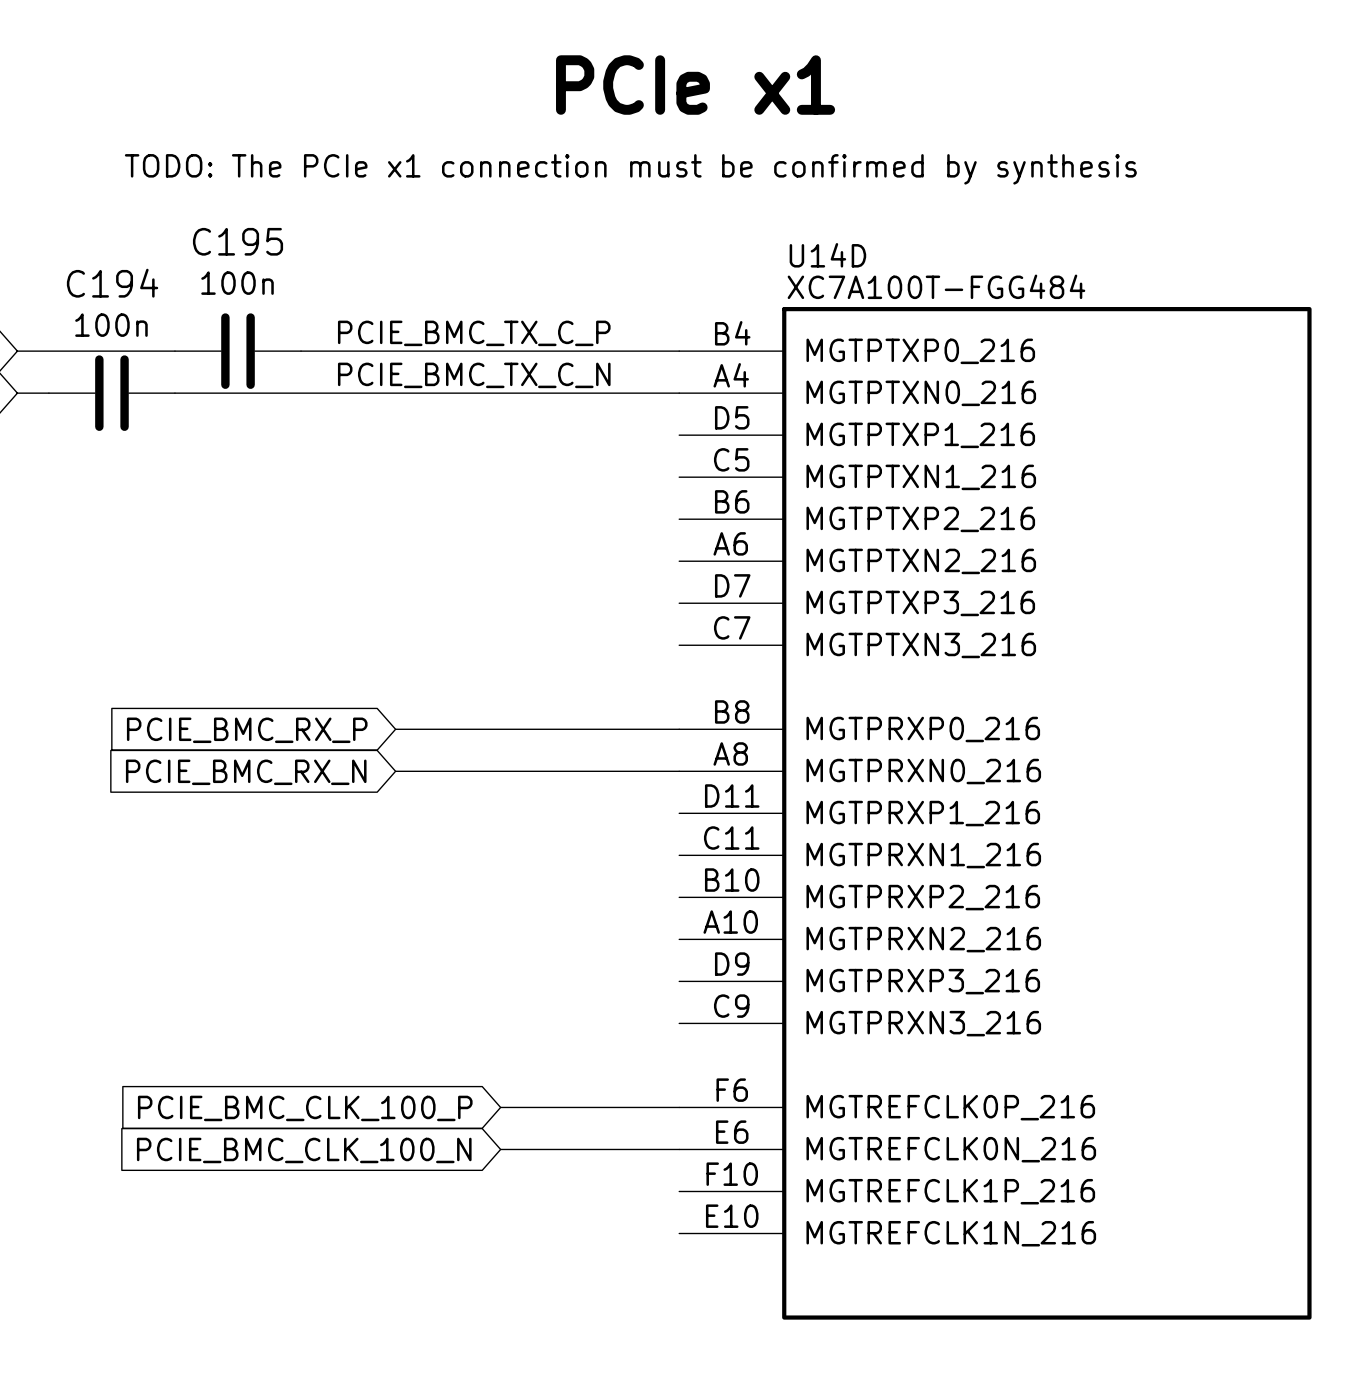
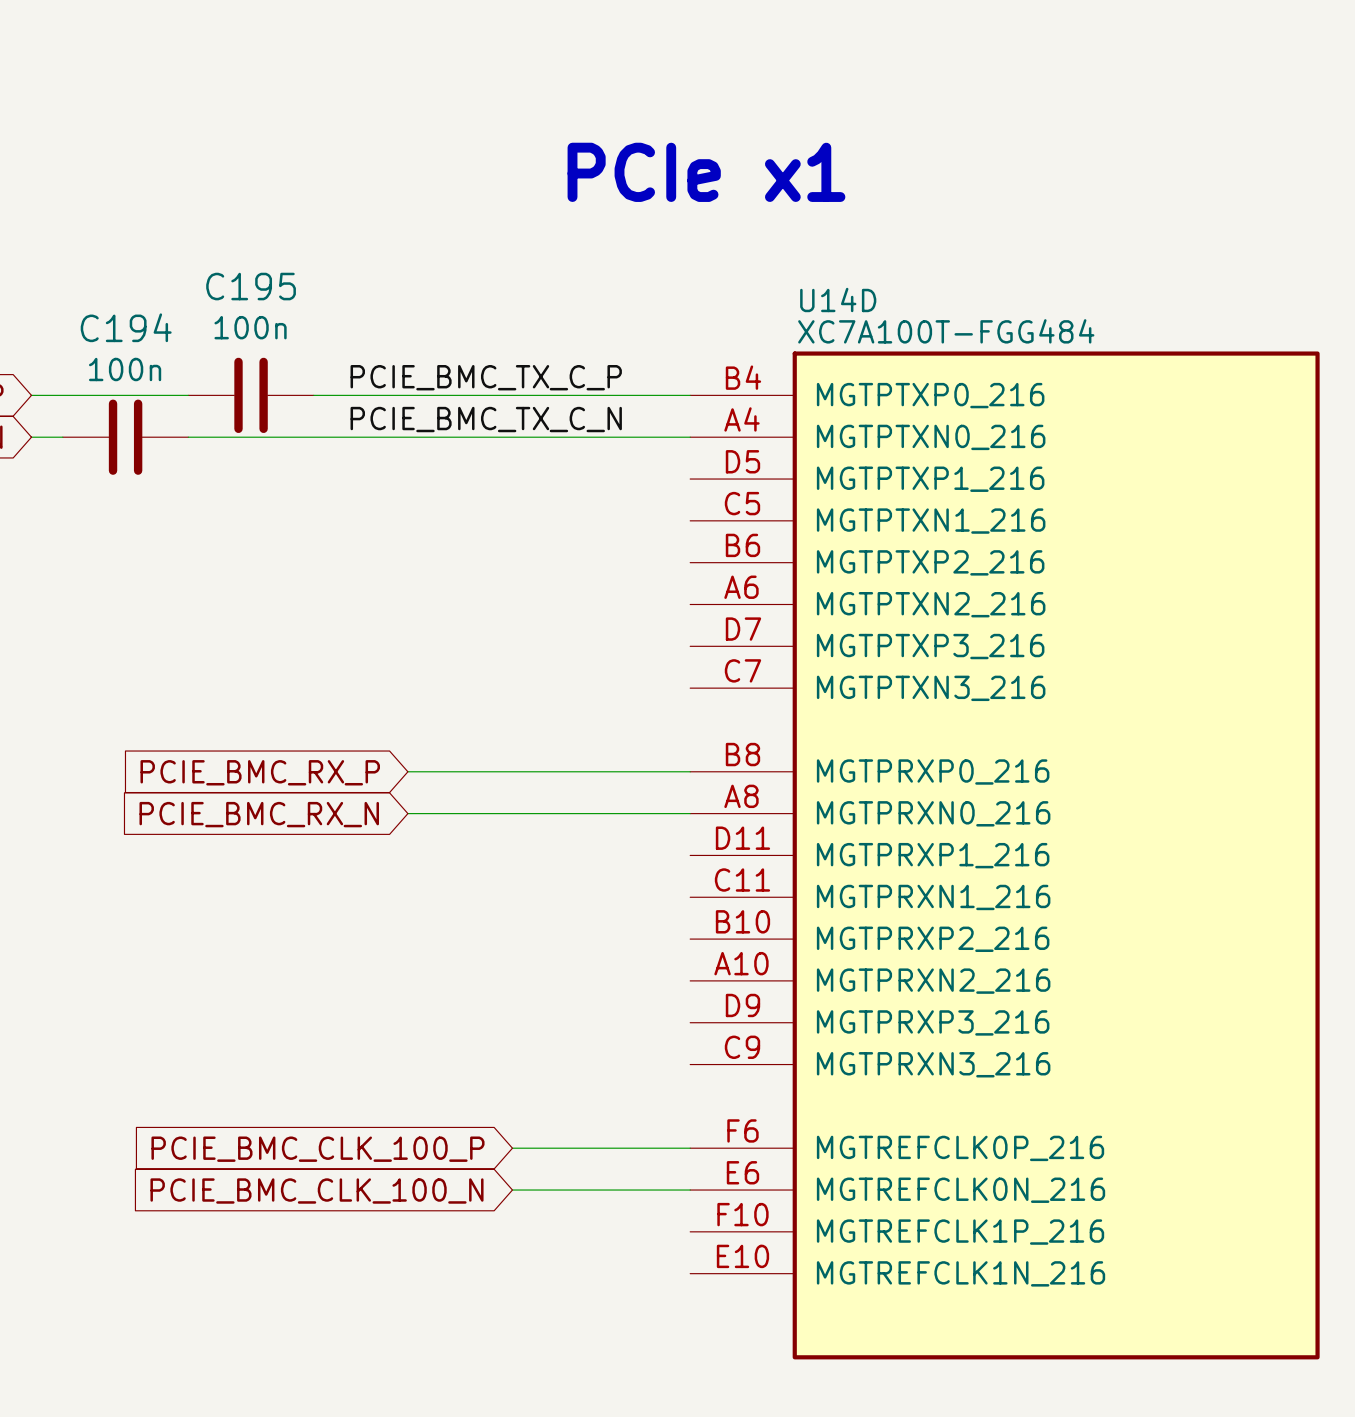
text position: PCIe x1 (695, 85) -> PCIe x1 (706, 172)
text: TODO: The PCIe x1 connection must be confirmed by synthesis (630, 169) -> none

